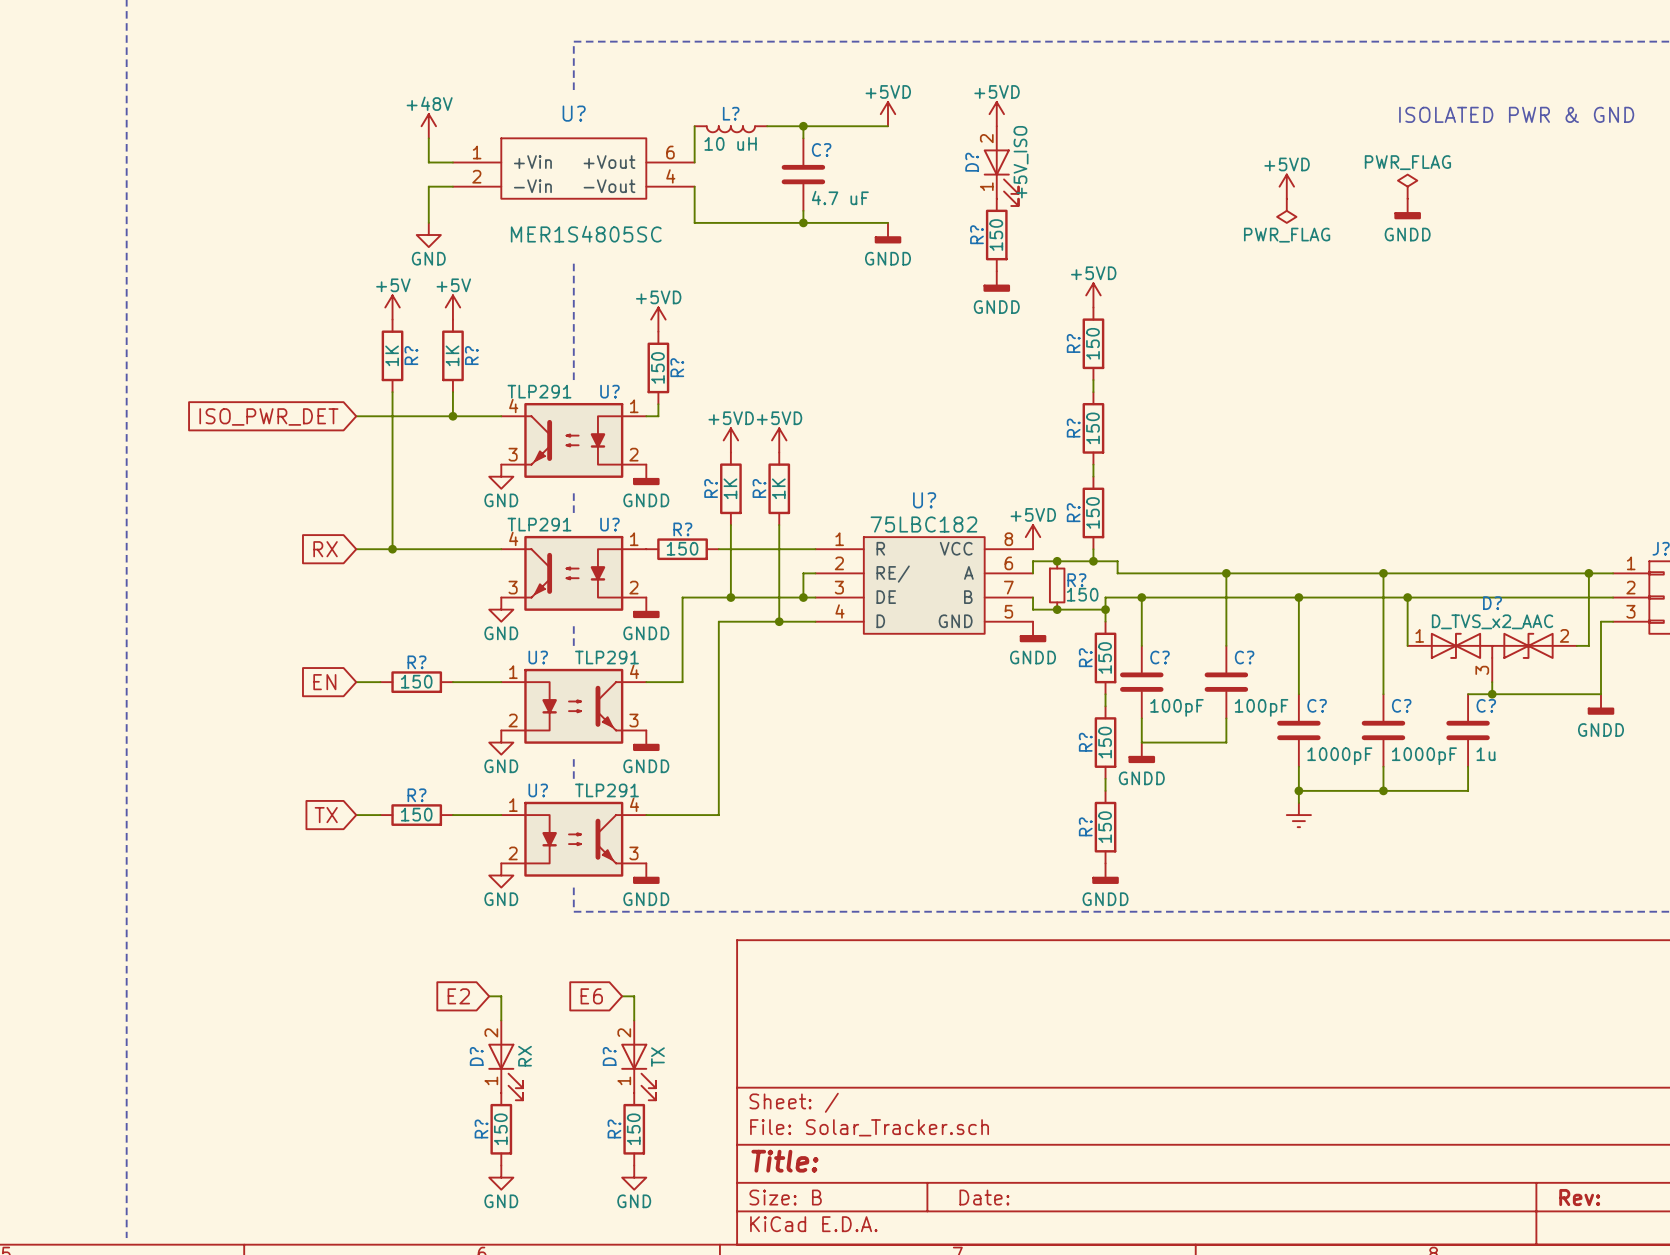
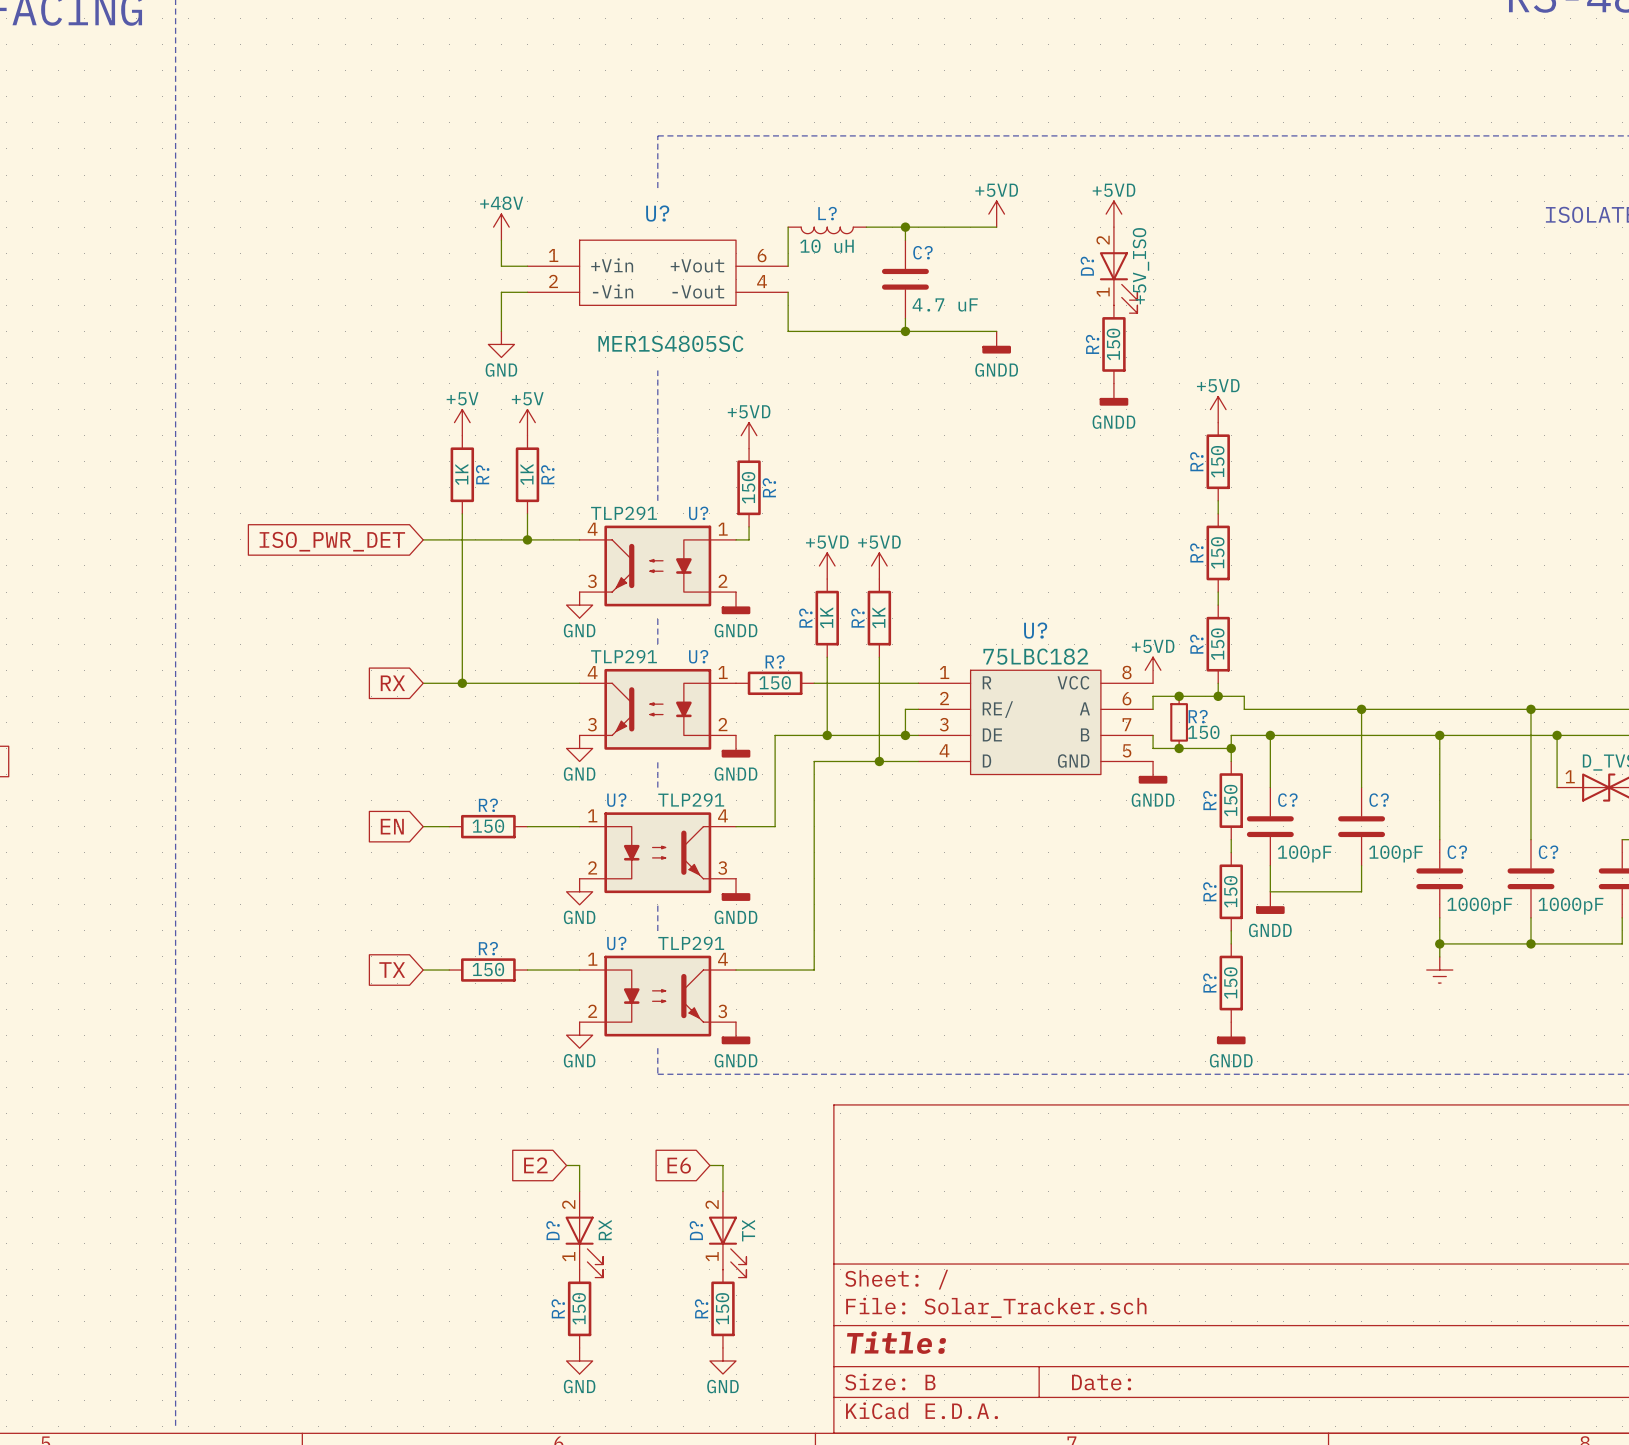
power symbol: +5VD (1286, 186) -> none
power symbol: PWR_FLAG (1407, 186) -> none
power symbol: GNDD (1407, 209) -> none
power symbol: PWR_FLAG (1286, 210) -> none

